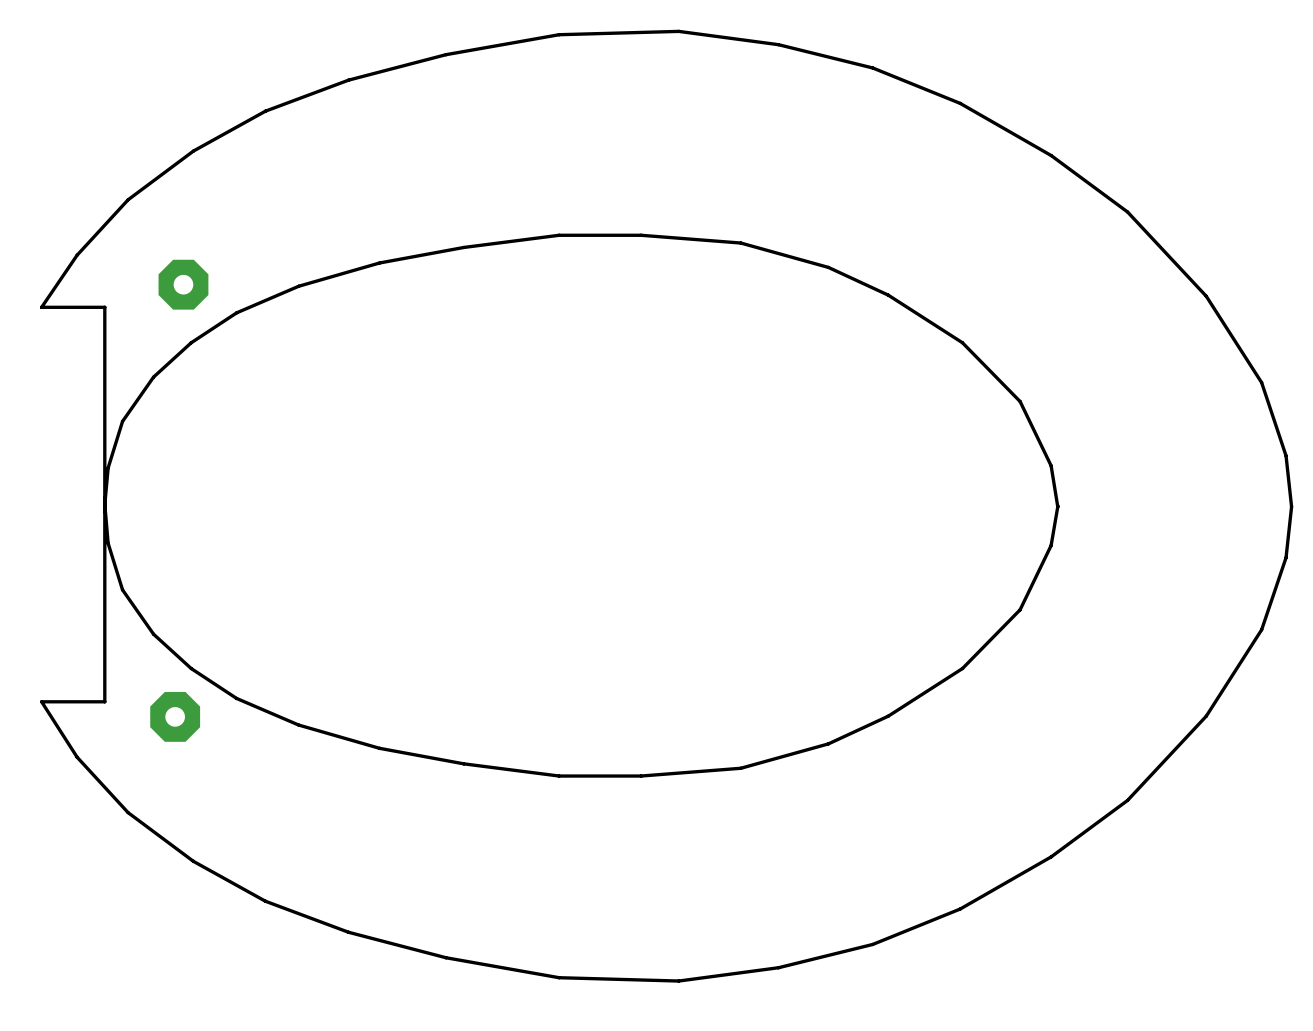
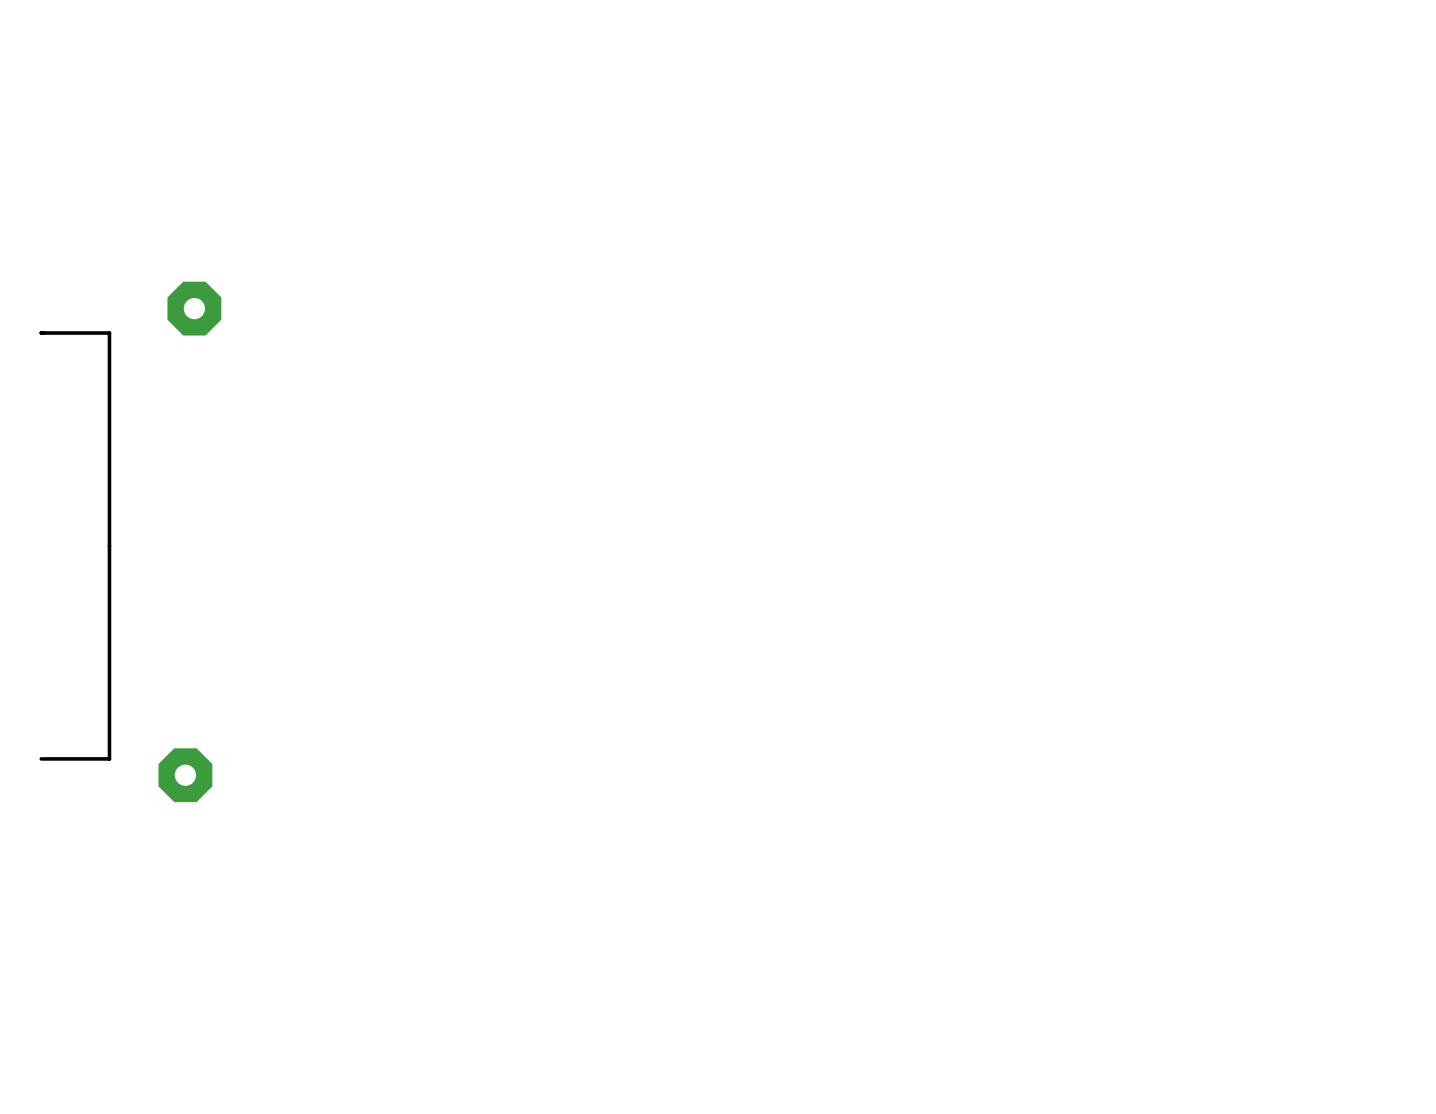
board edge: (41, 307) (77, 255) (128, 199) (193, 151) (265, 111) (348, 80) (446, 54) (559, 34) (678, 31) (778, 44) (872, 67) (960, 103) (1051, 155) (1127, 212) (1206, 296) (1261, 382) (1286, 455) (1291, 506) (1286, 557) (1261, 629) (1206, 716) (1127, 800) (1051, 856) (960, 909) (872, 944) (778, 967) (678, 981) (559, 977) (446, 957) (348, 932) (265, 901) (193, 861) (128, 812) (77, 757) (41, 701) -> none
board edge: (1057, 506) (1051, 465) (1020, 401) (962, 342) (888, 295) (828, 267) (740, 243) (641, 235) (559, 235) (463, 247) (379, 262) (298, 286) (236, 312) (191, 342) (153, 377) (122, 421) (108, 467) (104, 504) (108, 543) (122, 589) (153, 634) (191, 668) (236, 698) (298, 725) (379, 748) (463, 763) (559, 776) (641, 776) (740, 768) (828, 743) (888, 716) (962, 668) (1020, 609) (1051, 545) (1057, 506) -> none

